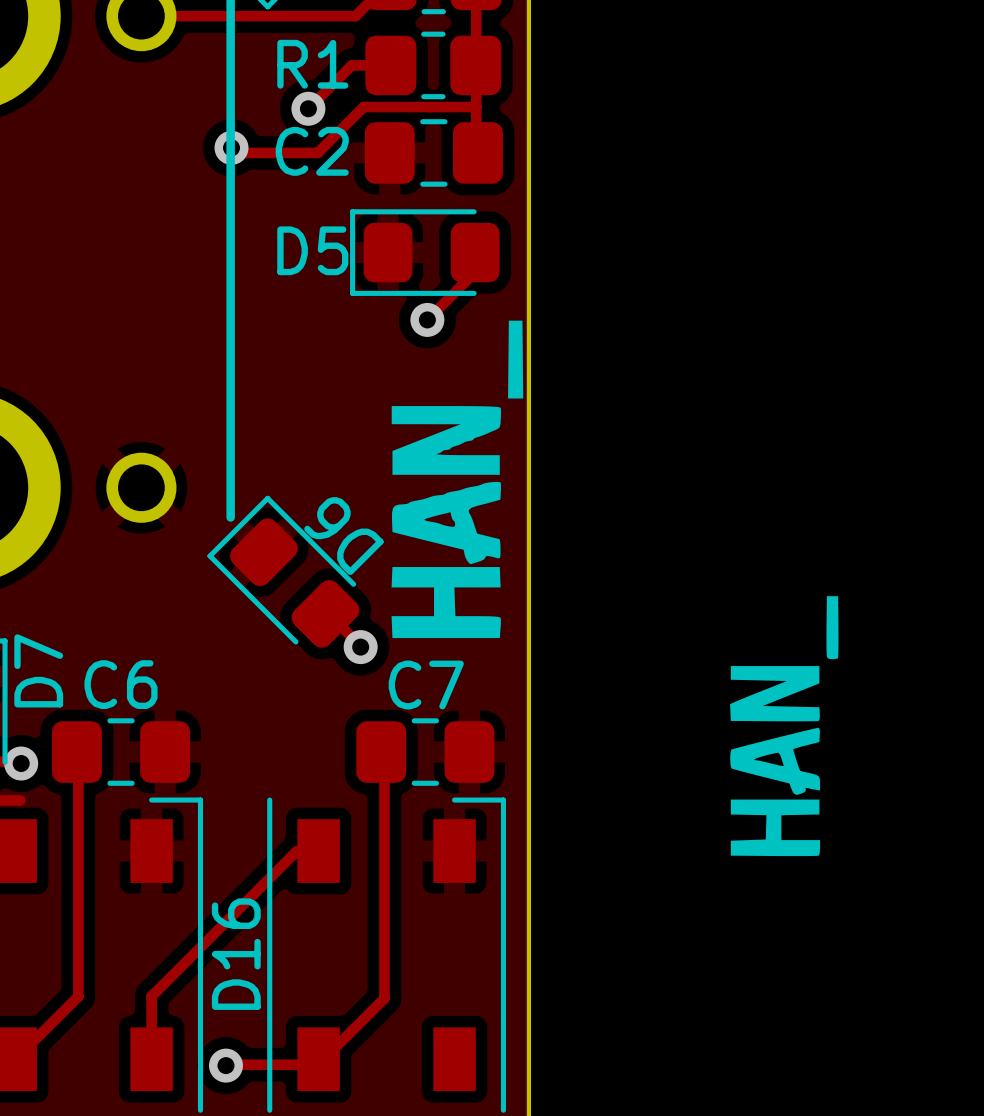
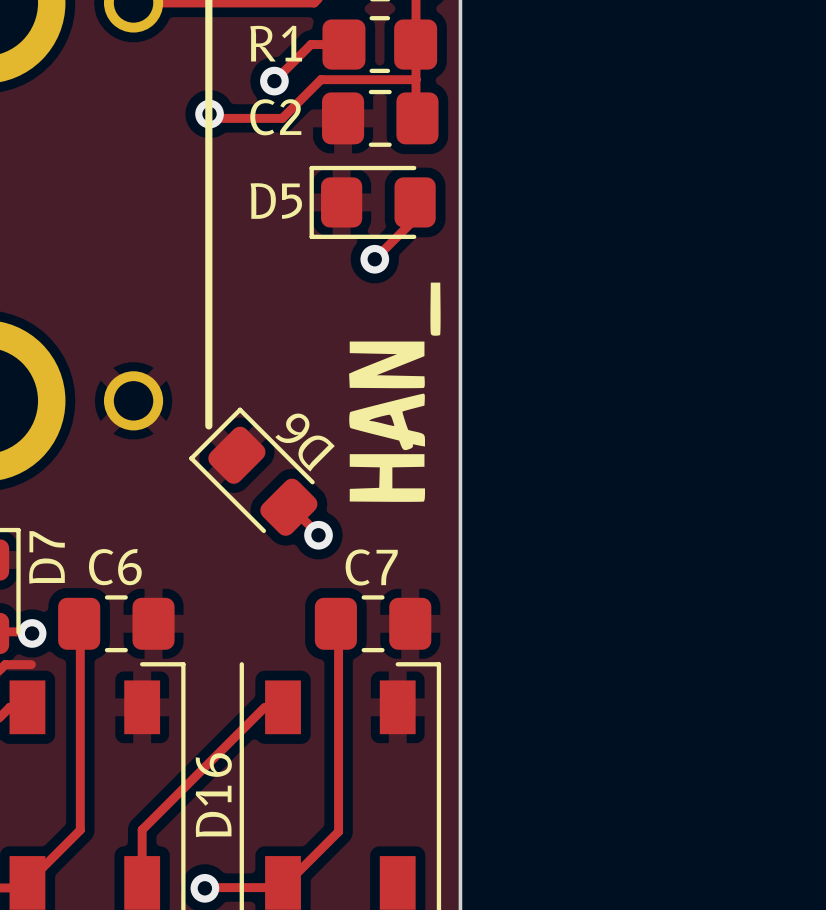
drawing: [391, 320, 524, 639] -> none
drawing position: (784, 726) -> (394, 392)

